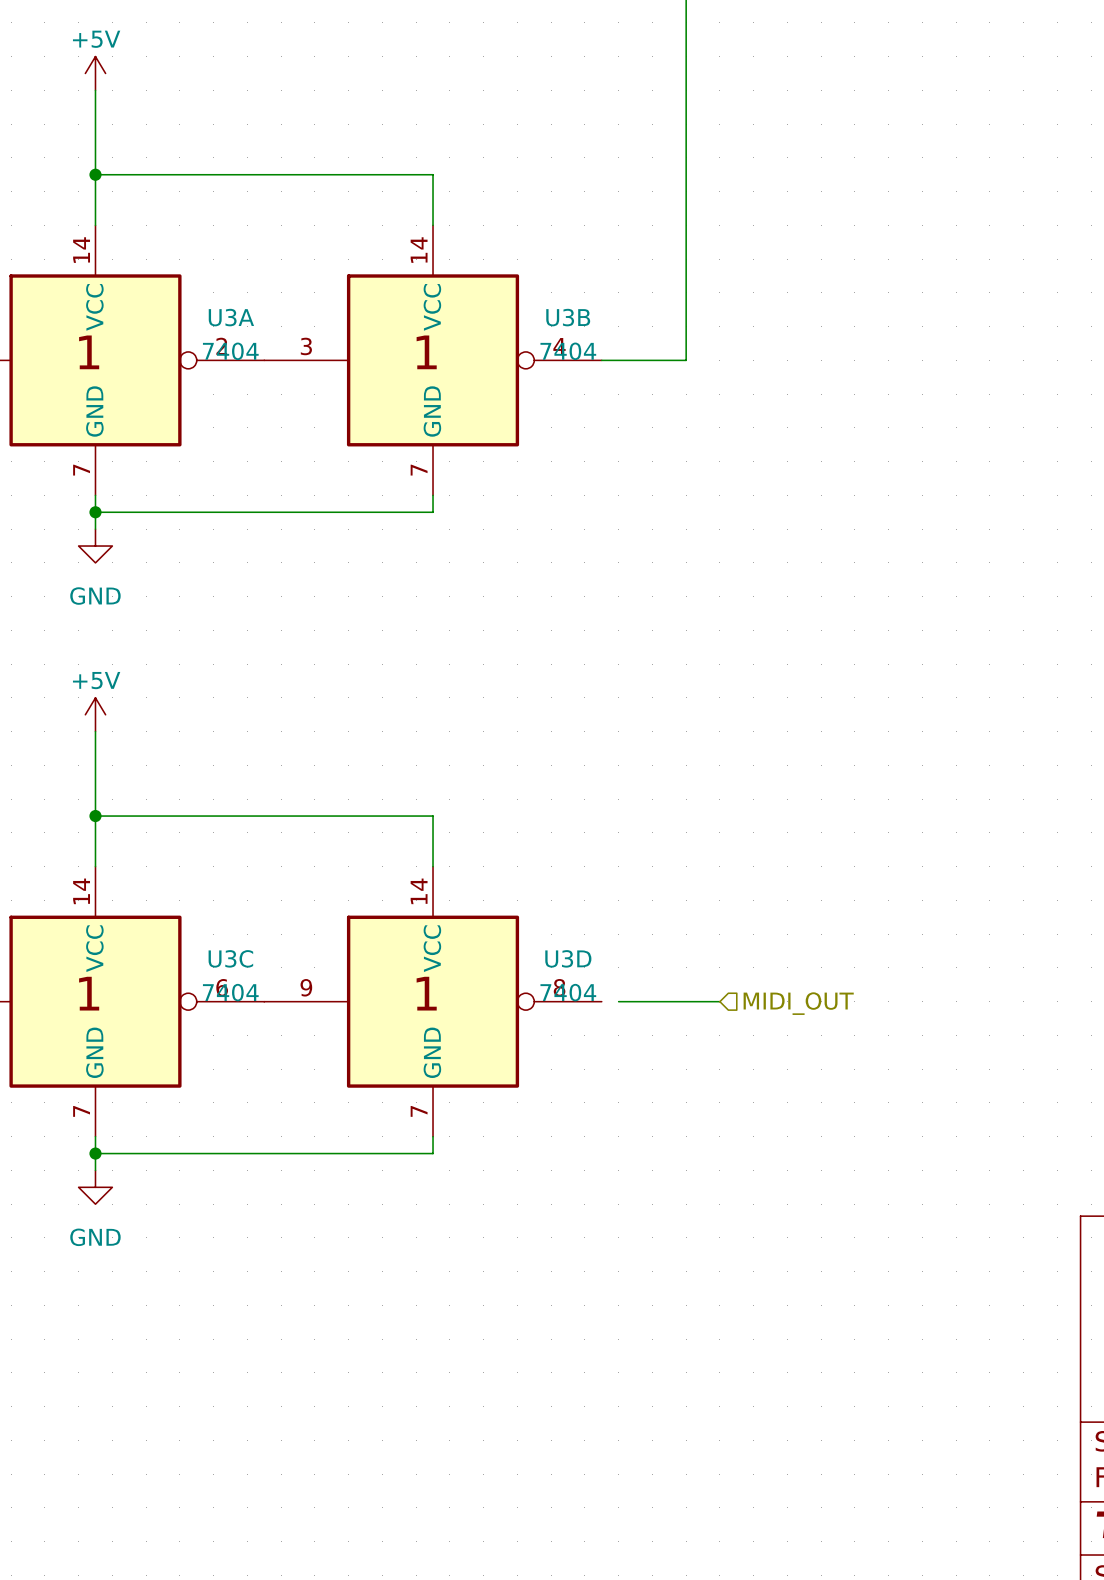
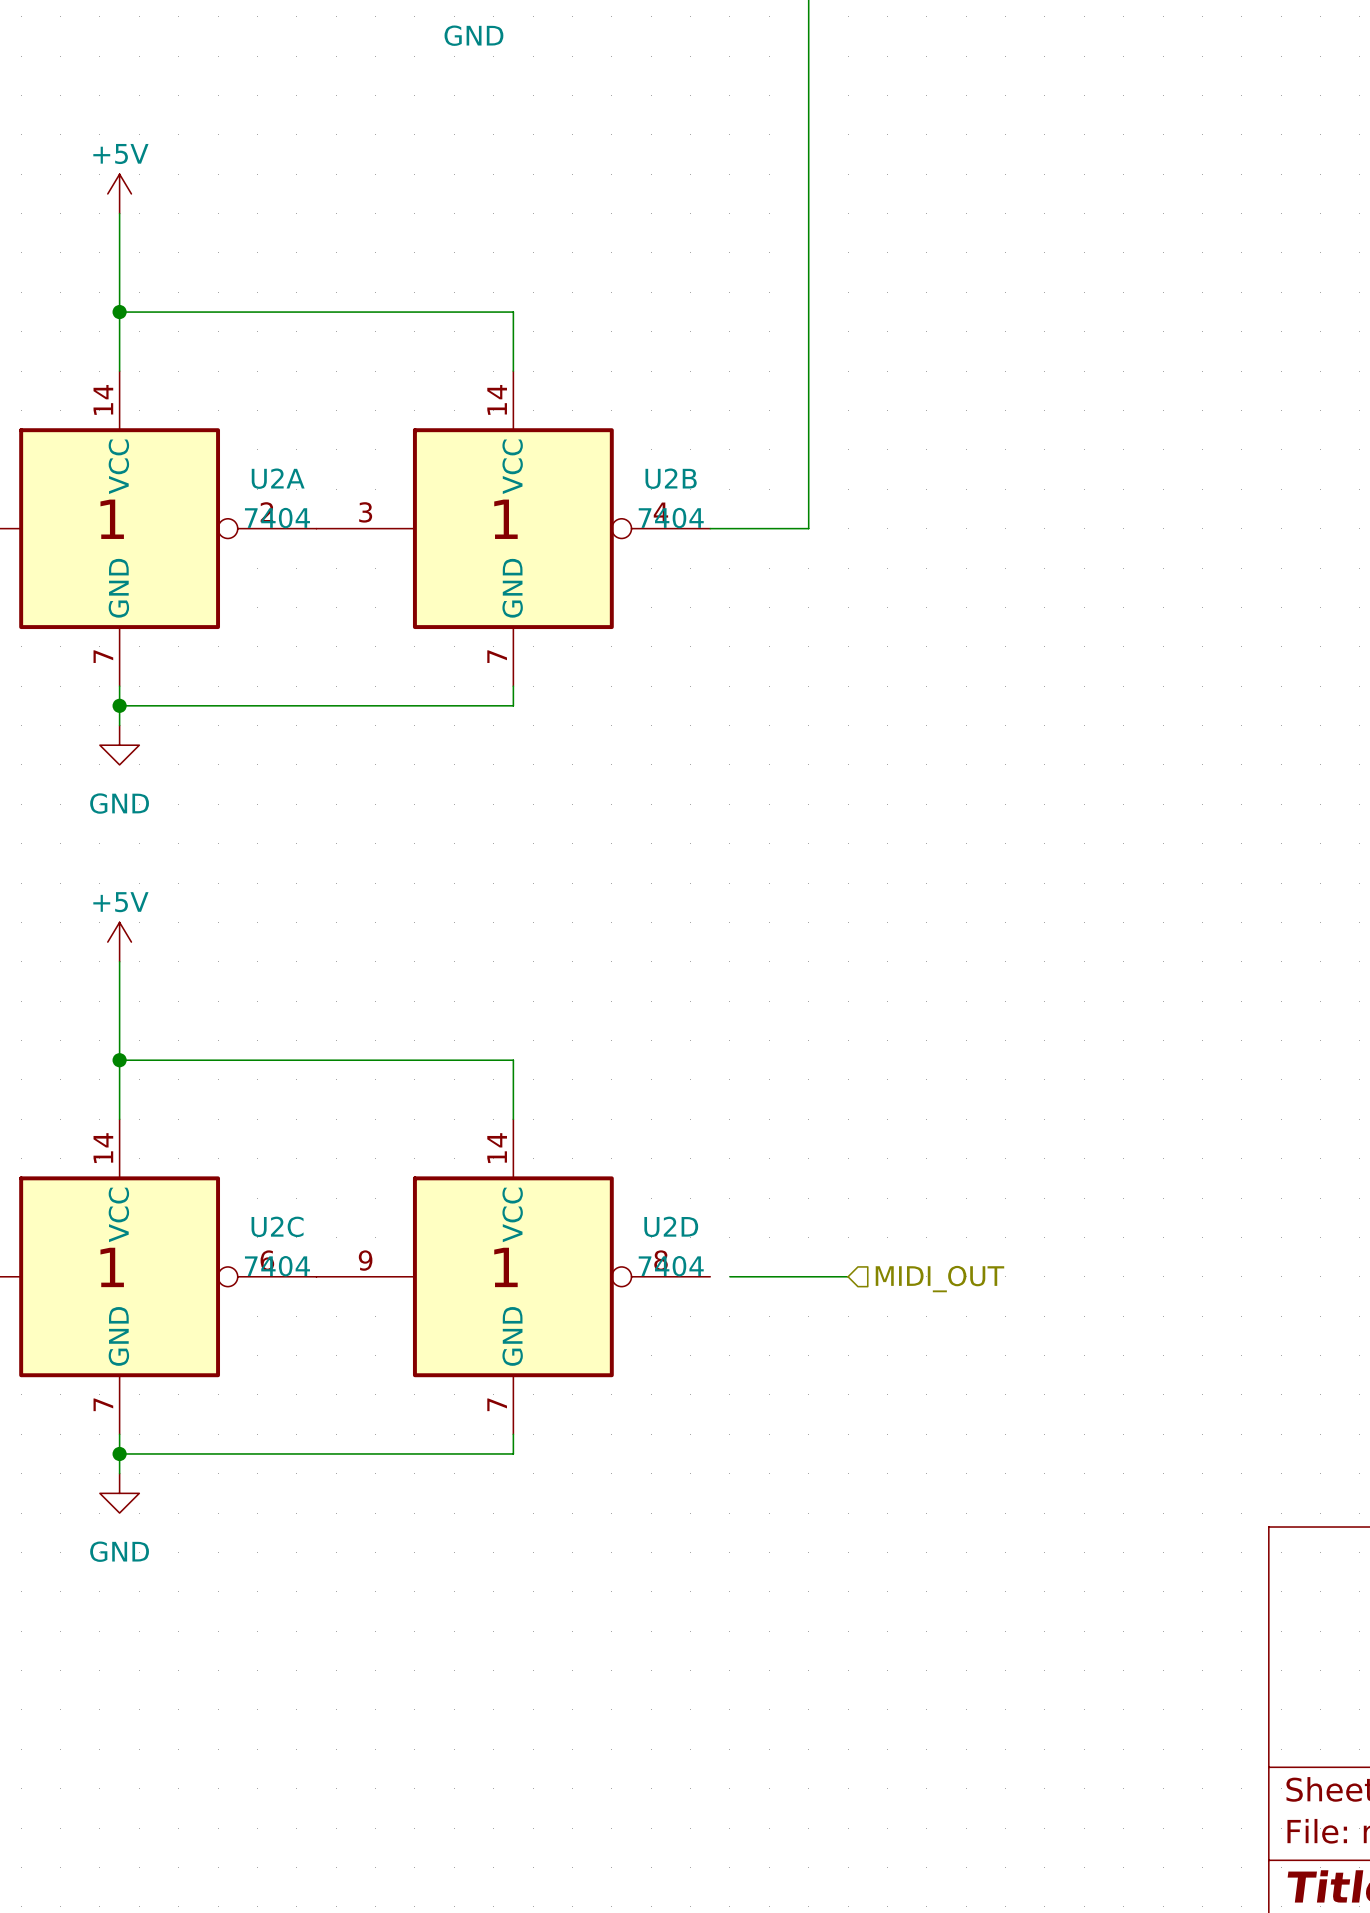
U3A name: U3A (231, 317) -> U2A (278, 478)
U3B name: U3B (568, 317) -> U2B (671, 478)
U3C name: U3C (230, 958) -> U2C (277, 1226)
U3D name: U3D (568, 958) -> U2D (671, 1226)

